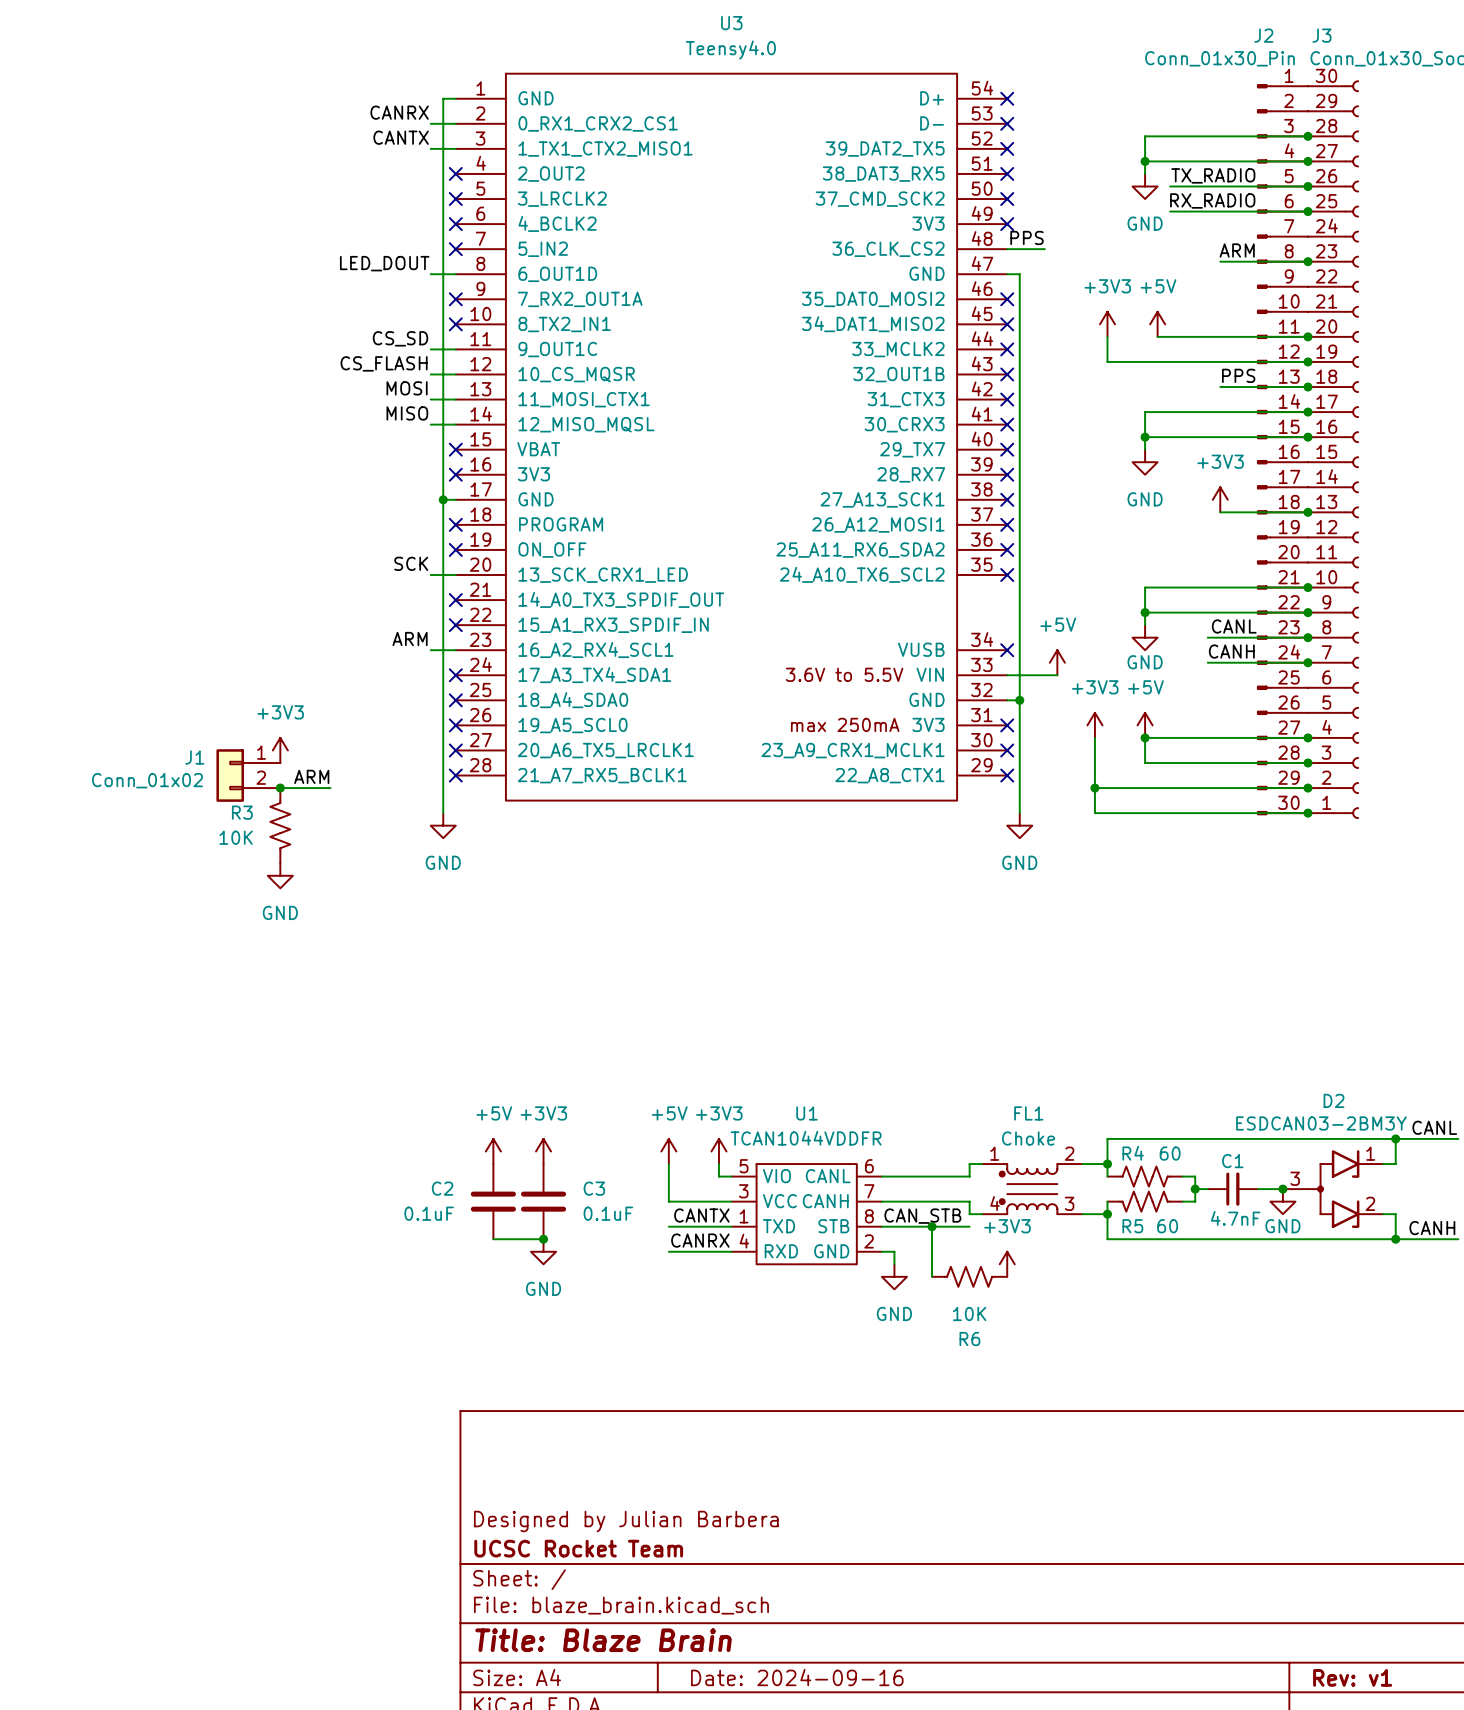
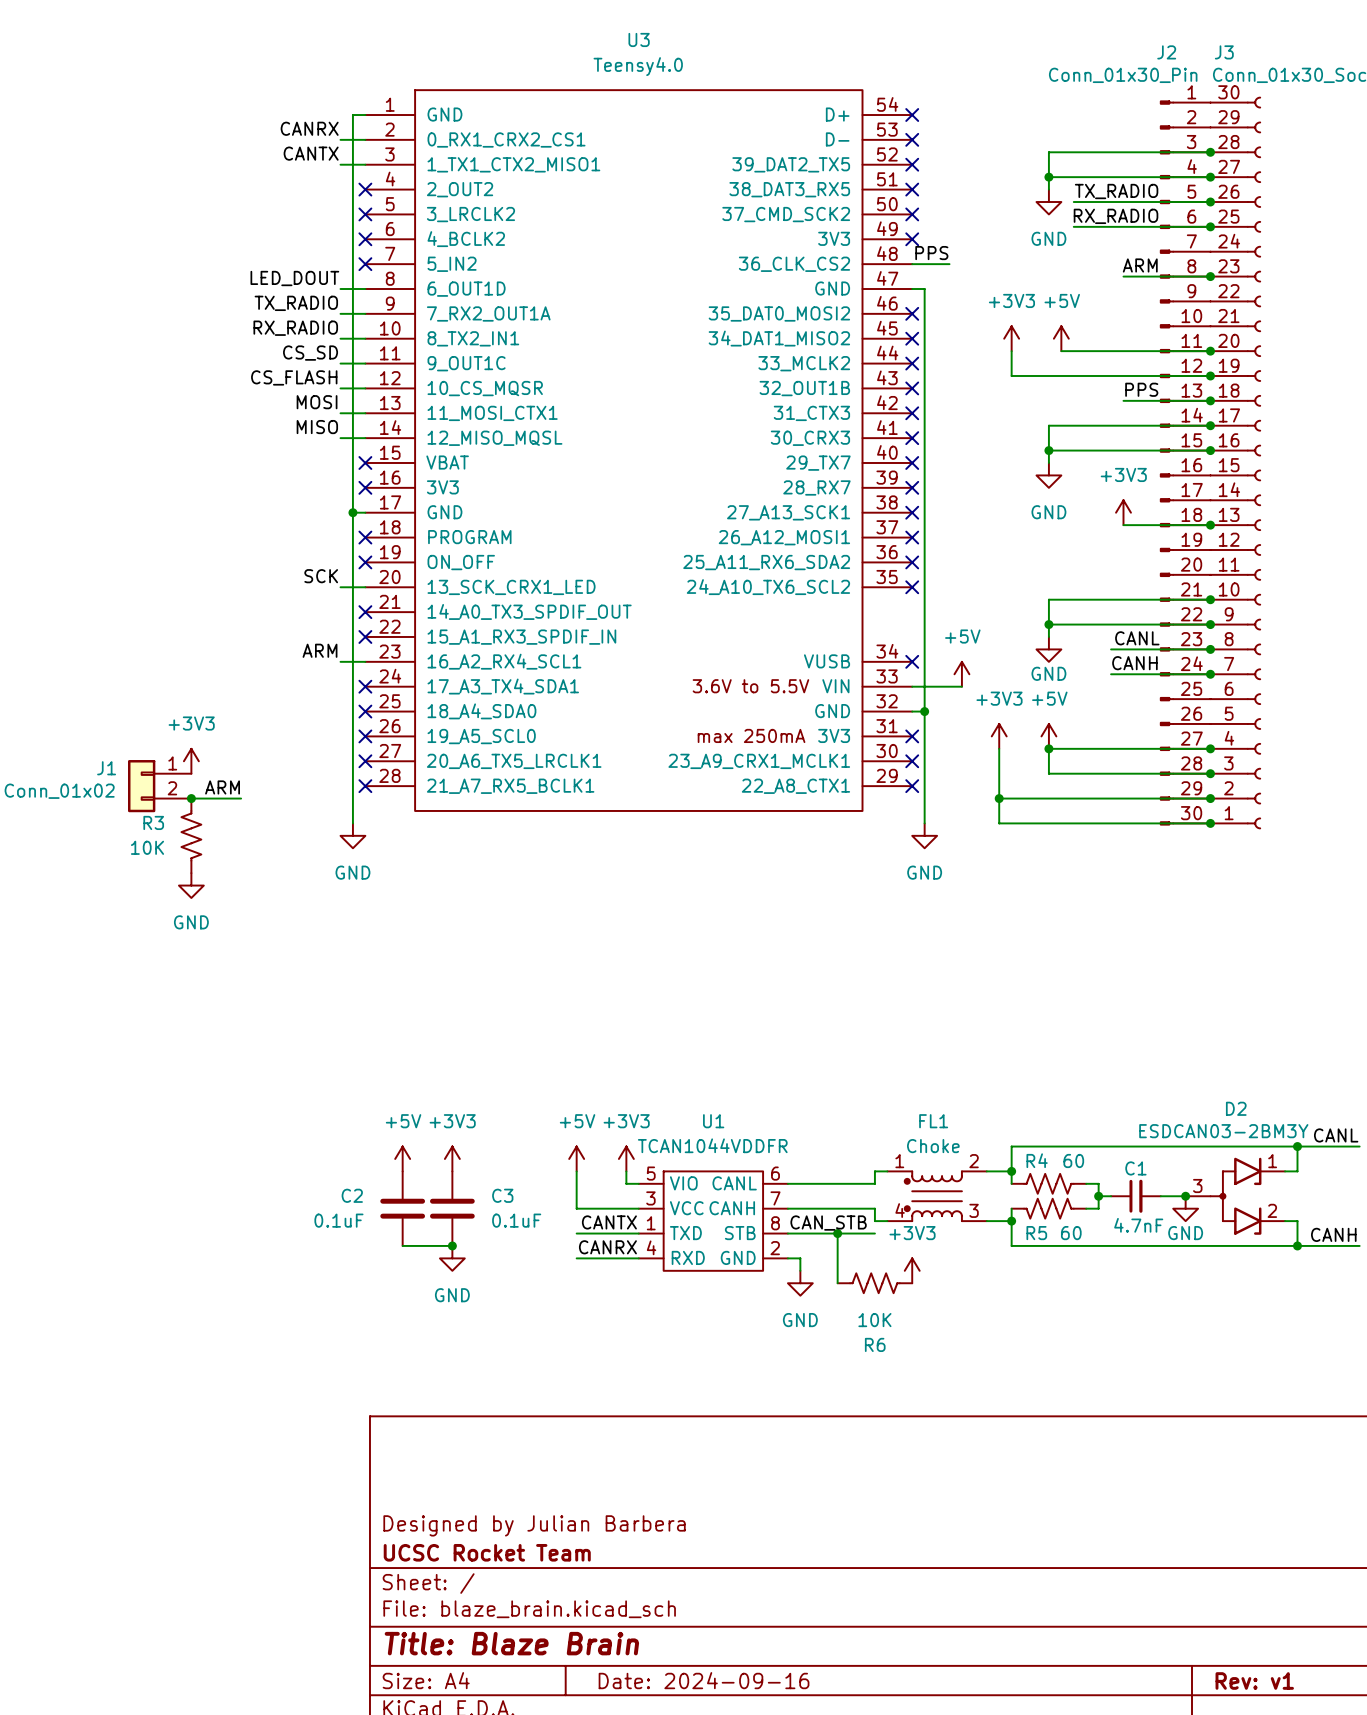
label: none -> TX_RADIO (296, 303)
wire: none -> (340, 313) (365, 313)
no-connect mark: (455, 299) -> none
label: none -> RX_RADIO (295, 328)
wire: none -> (340, 338) (365, 338)
no-connect mark: (455, 324) -> none

